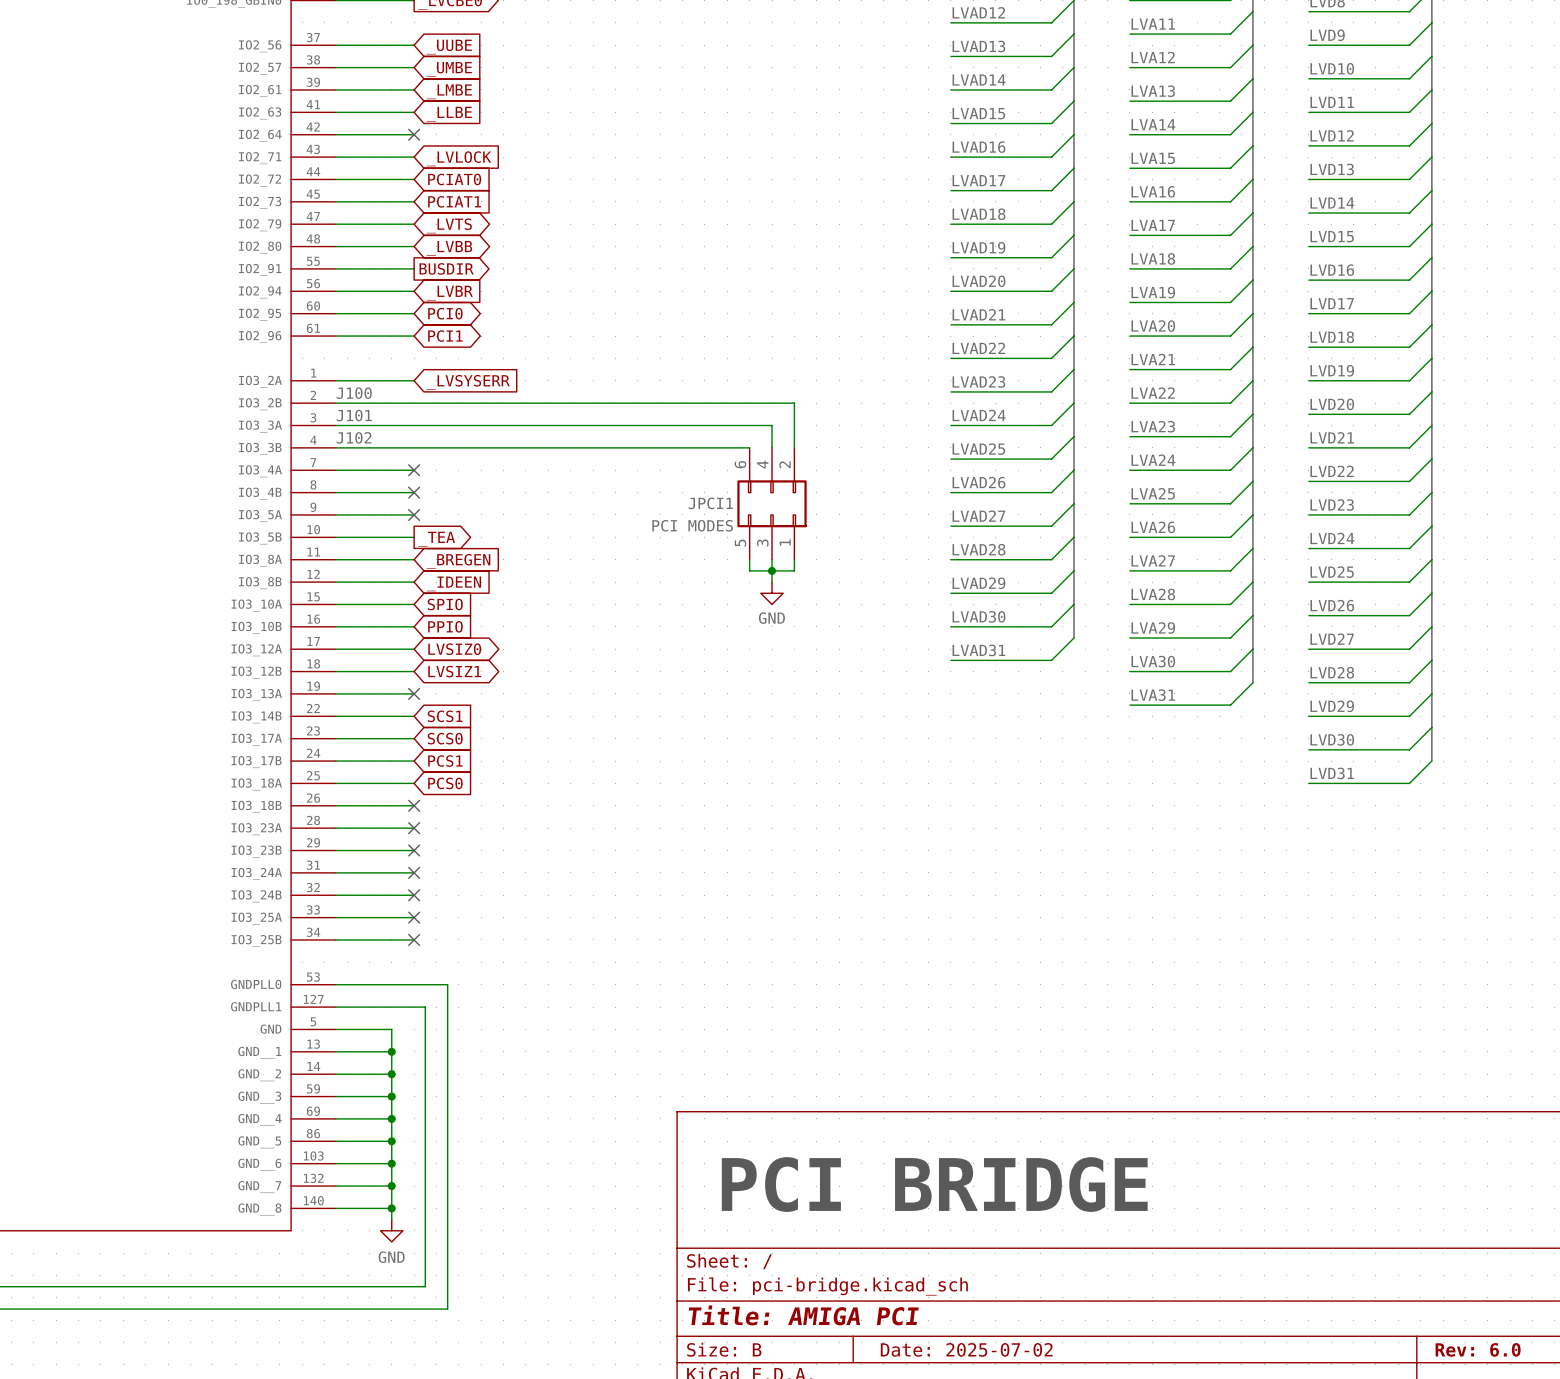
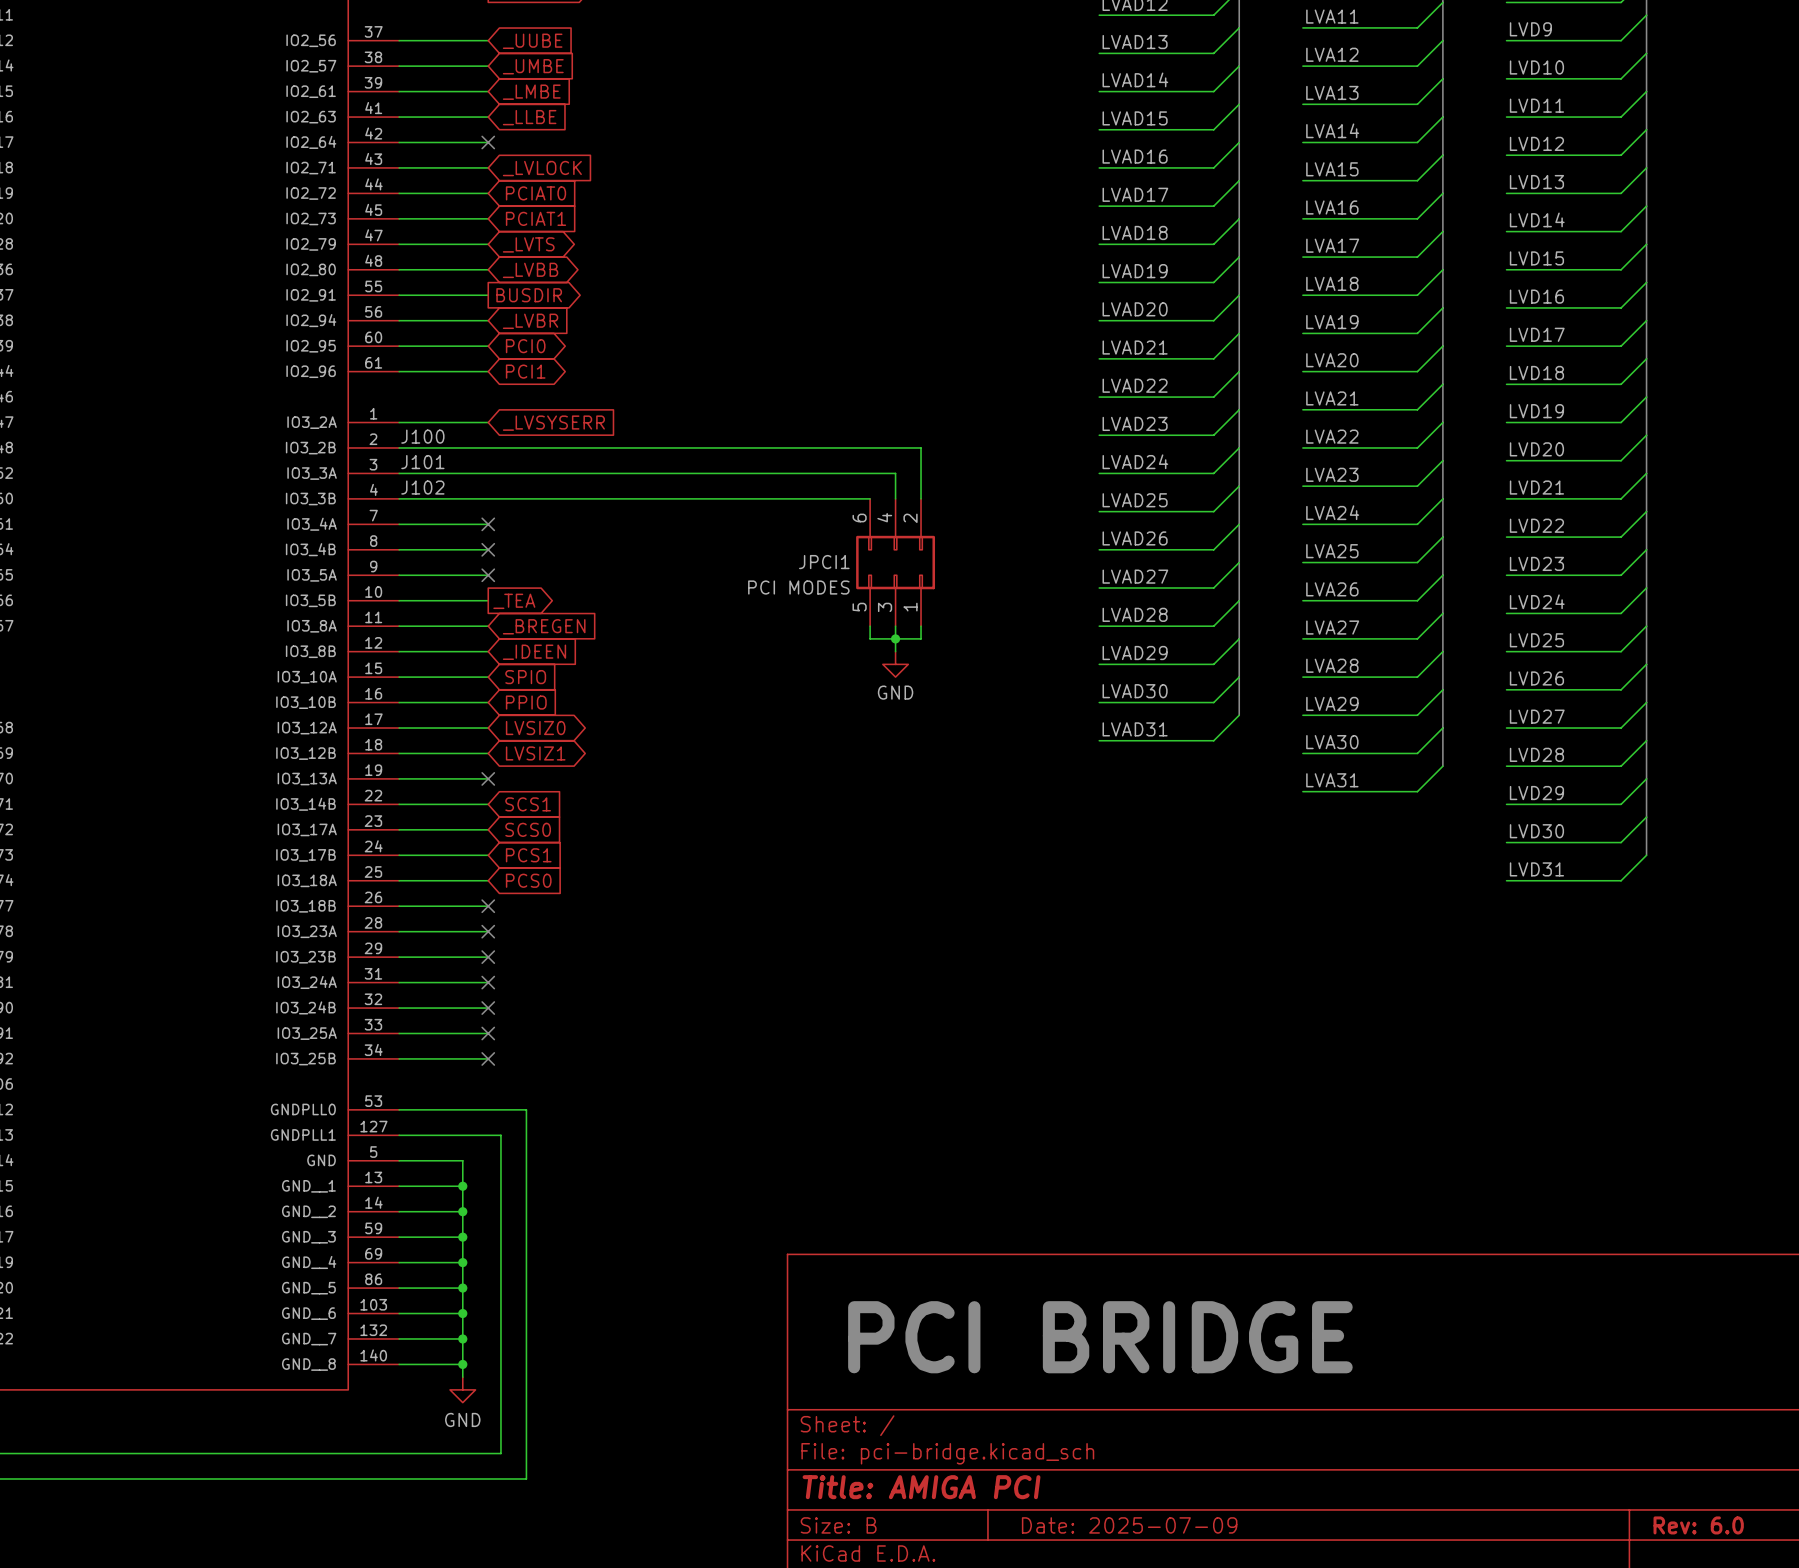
title block: Date: 2025-07-02 (966, 1349) -> Date: 2025-07-09 (1129, 1525)

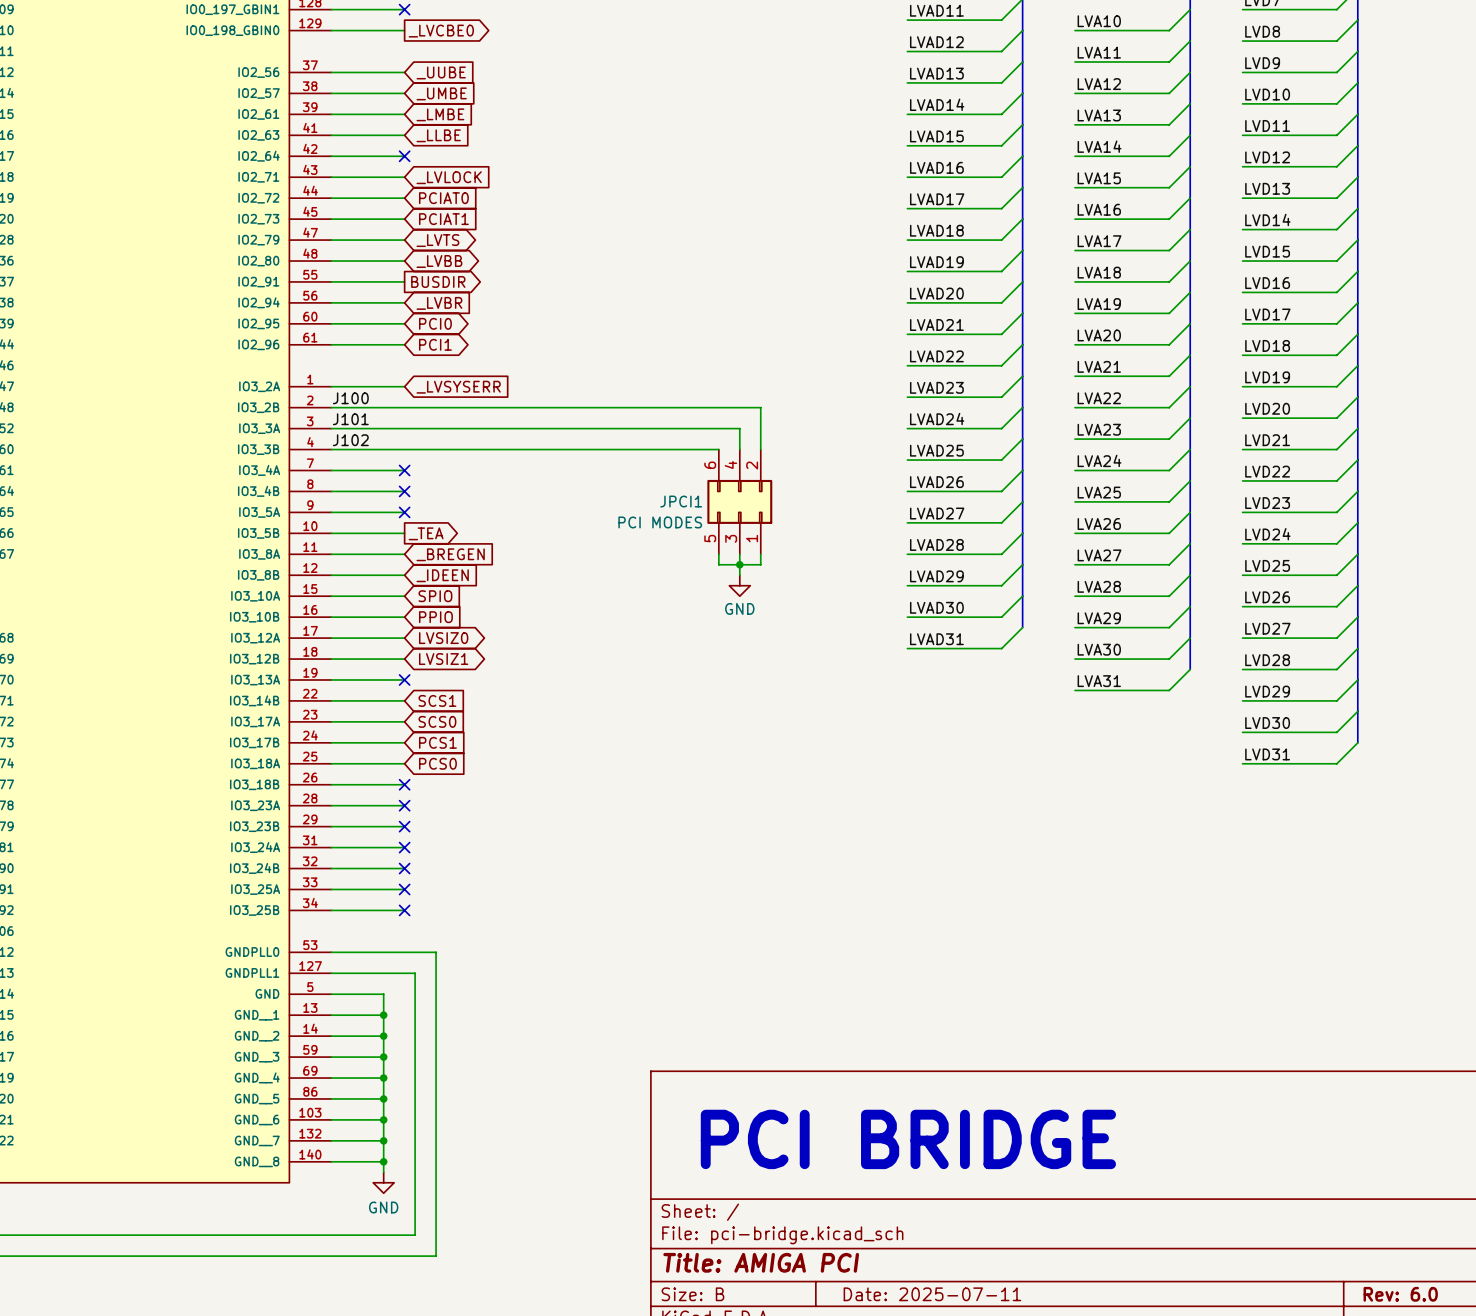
title block: Date: 2025-07-09 (1129, 1525) -> Date: 2025-07-11 (932, 1294)

